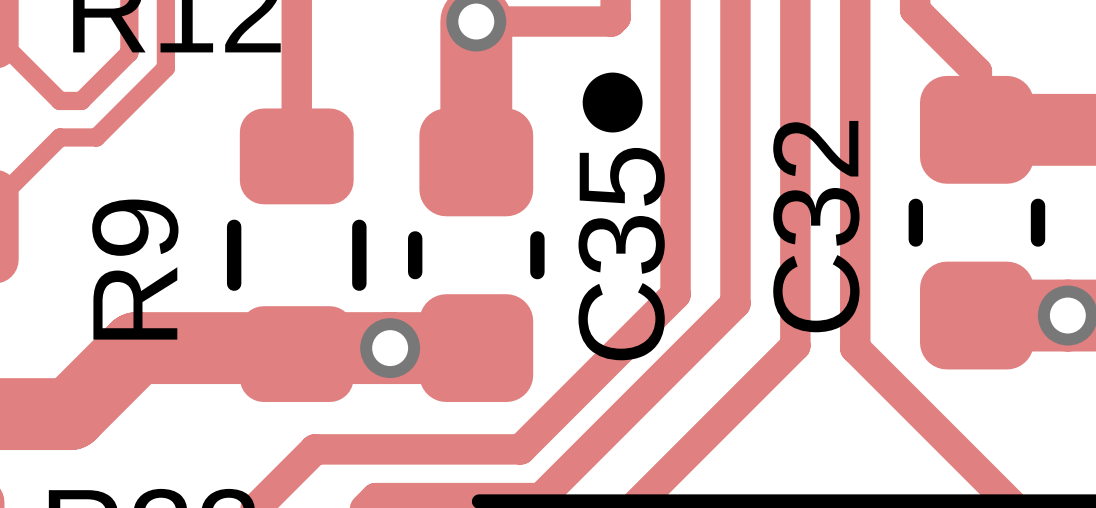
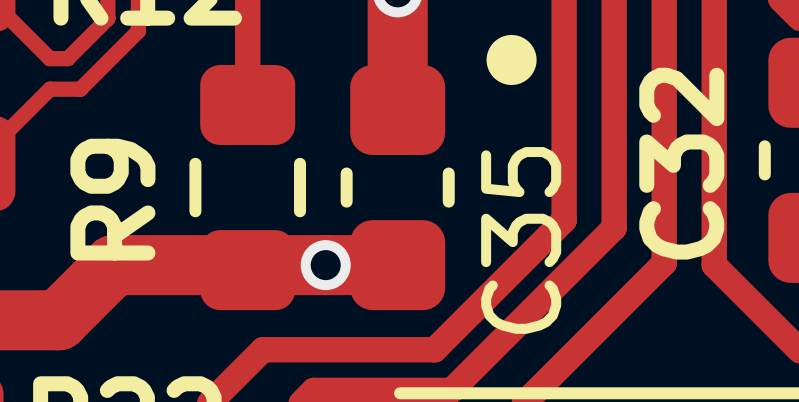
C35 name position: C35 (621, 254) -> C35 (521, 240)

